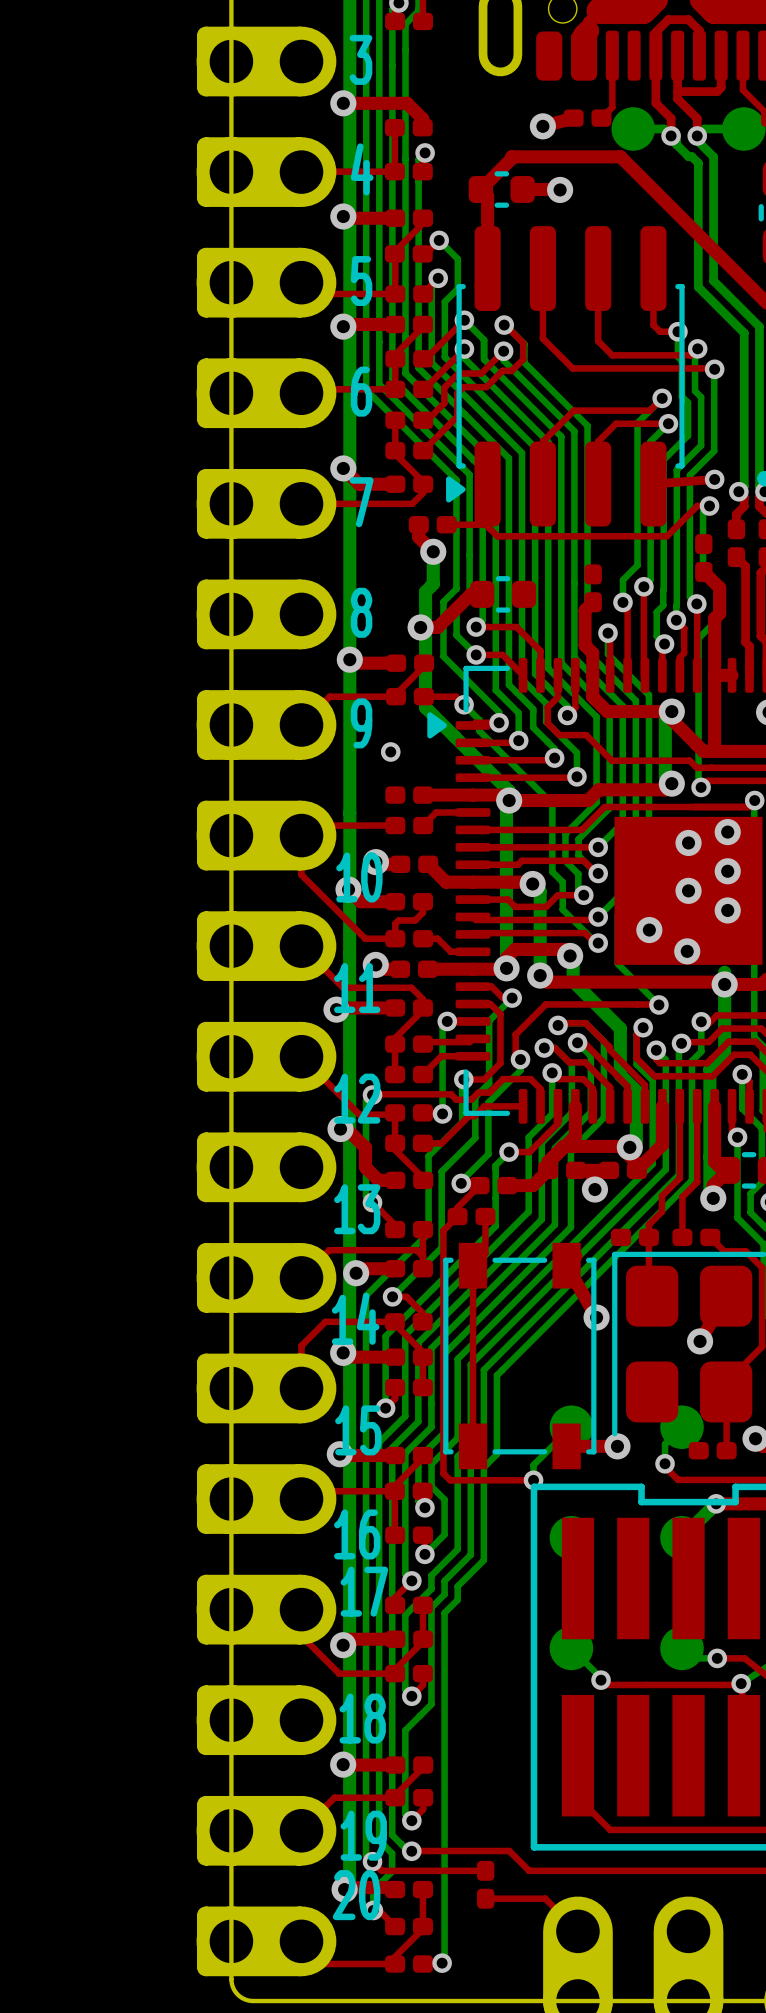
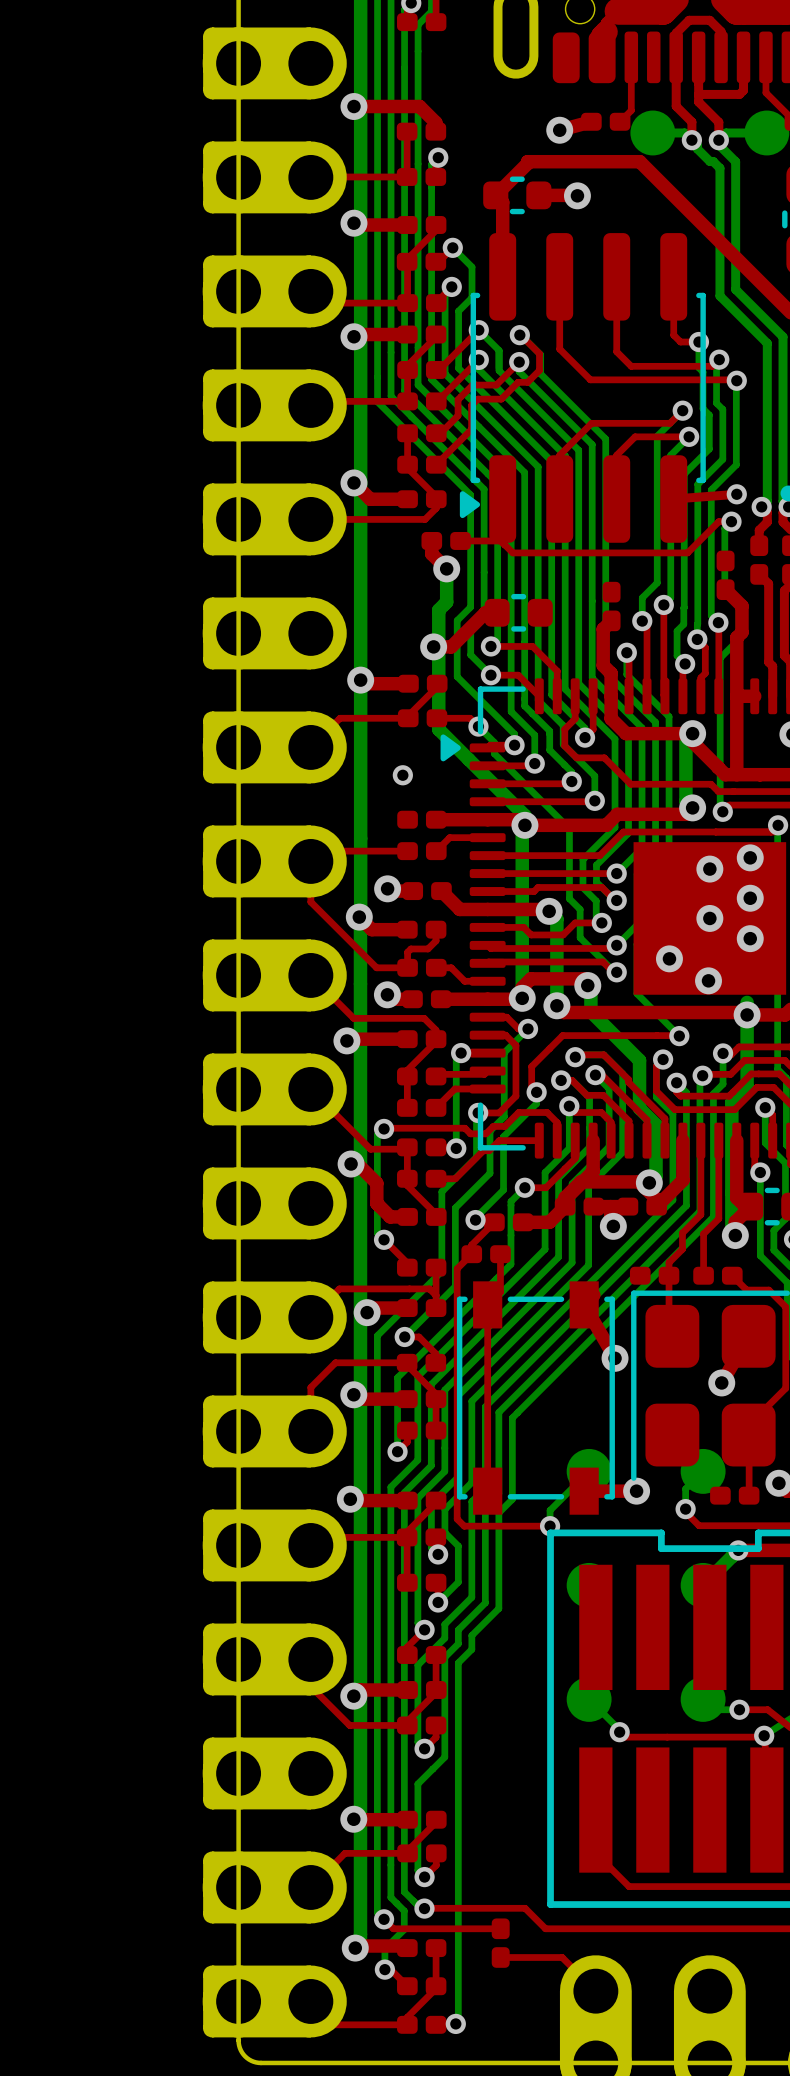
text: 3 (360, 59) -> none
text: 4 (362, 169) -> none
text: 5 (361, 281) -> none
text: 6 (361, 391) -> none
text: 7 (361, 502) -> none
text: 8 (361, 612) -> none
text: 9 (361, 723) -> none
text: 10 (359, 877) -> none
text: 11 (357, 988) -> none
text: 12 (357, 1098) -> none
text: 13 (357, 1209) -> none
text: 14 (355, 1318) -> none
text: 15 (358, 1430) -> none
text: 16 (357, 1534) -> none
text: 17 (364, 1591) -> none
text: 18 (362, 1718) -> none
text: 19 (363, 1835) -> none
text: 20 (356, 1895) -> none

